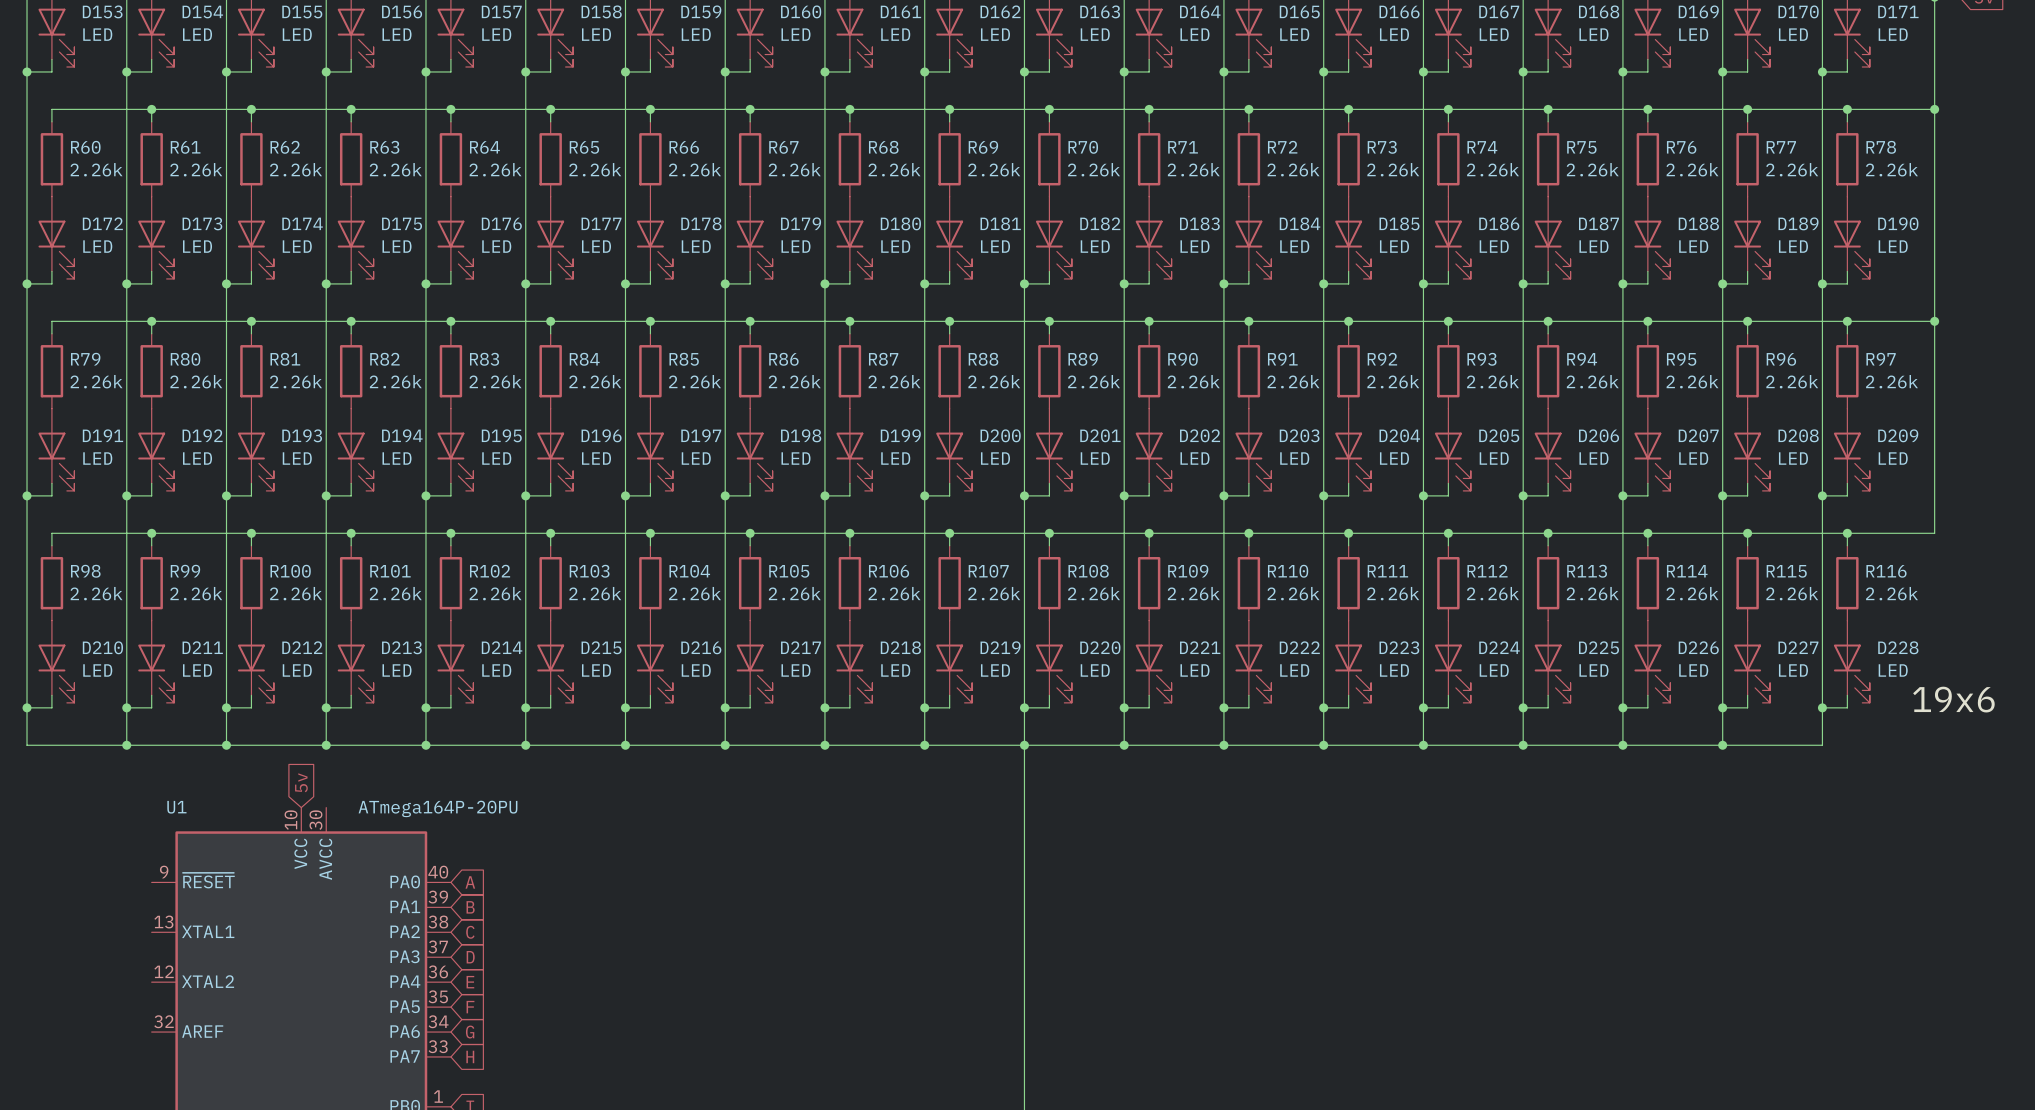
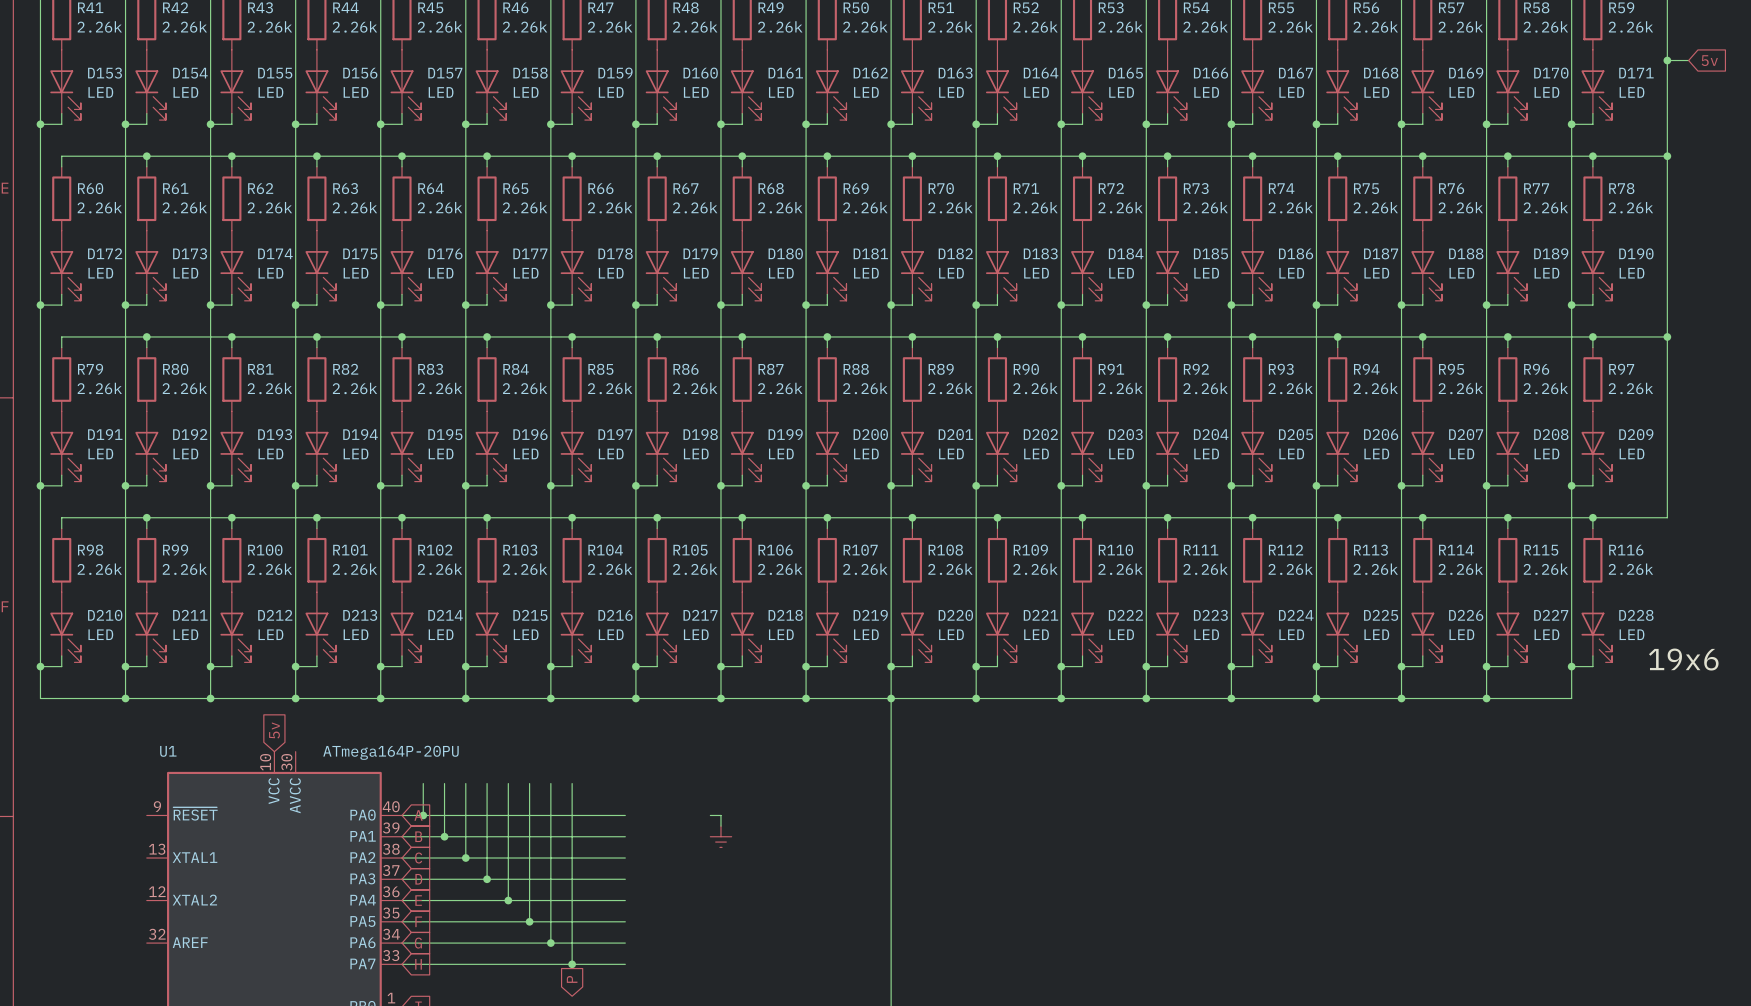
wire: none -> (423, 783) (423, 815)
wire: none -> (444, 783) (444, 836)
wire: none -> (465, 783) (465, 858)
wire: none -> (487, 783) (487, 879)
wire: none -> (508, 783) (508, 900)
wire: none -> (529, 783) (529, 921)
wire: none -> (550, 783) (550, 943)
wire: none -> (572, 783) (572, 964)
wire: none -> (402, 815) (625, 815)
junction: none -> (423, 815)
wire: none -> (710, 815) (720, 815) (720, 826)
wire: none -> (402, 836) (625, 836)
junction: none -> (444, 836)
power symbol: none -> (720, 836)
wire: none -> (402, 858) (625, 858)
junction: none -> (465, 858)
wire: none -> (402, 879) (625, 879)
junction: none -> (487, 879)
wire: none -> (402, 900) (625, 900)
junction: none -> (508, 900)
wire: none -> (402, 921) (625, 921)
junction: none -> (529, 921)
wire: none -> (402, 943) (625, 943)
junction: none -> (550, 943)
wire: none -> (402, 964) (625, 964)
junction: none -> (572, 964)
global label: none -> P (572, 979)

